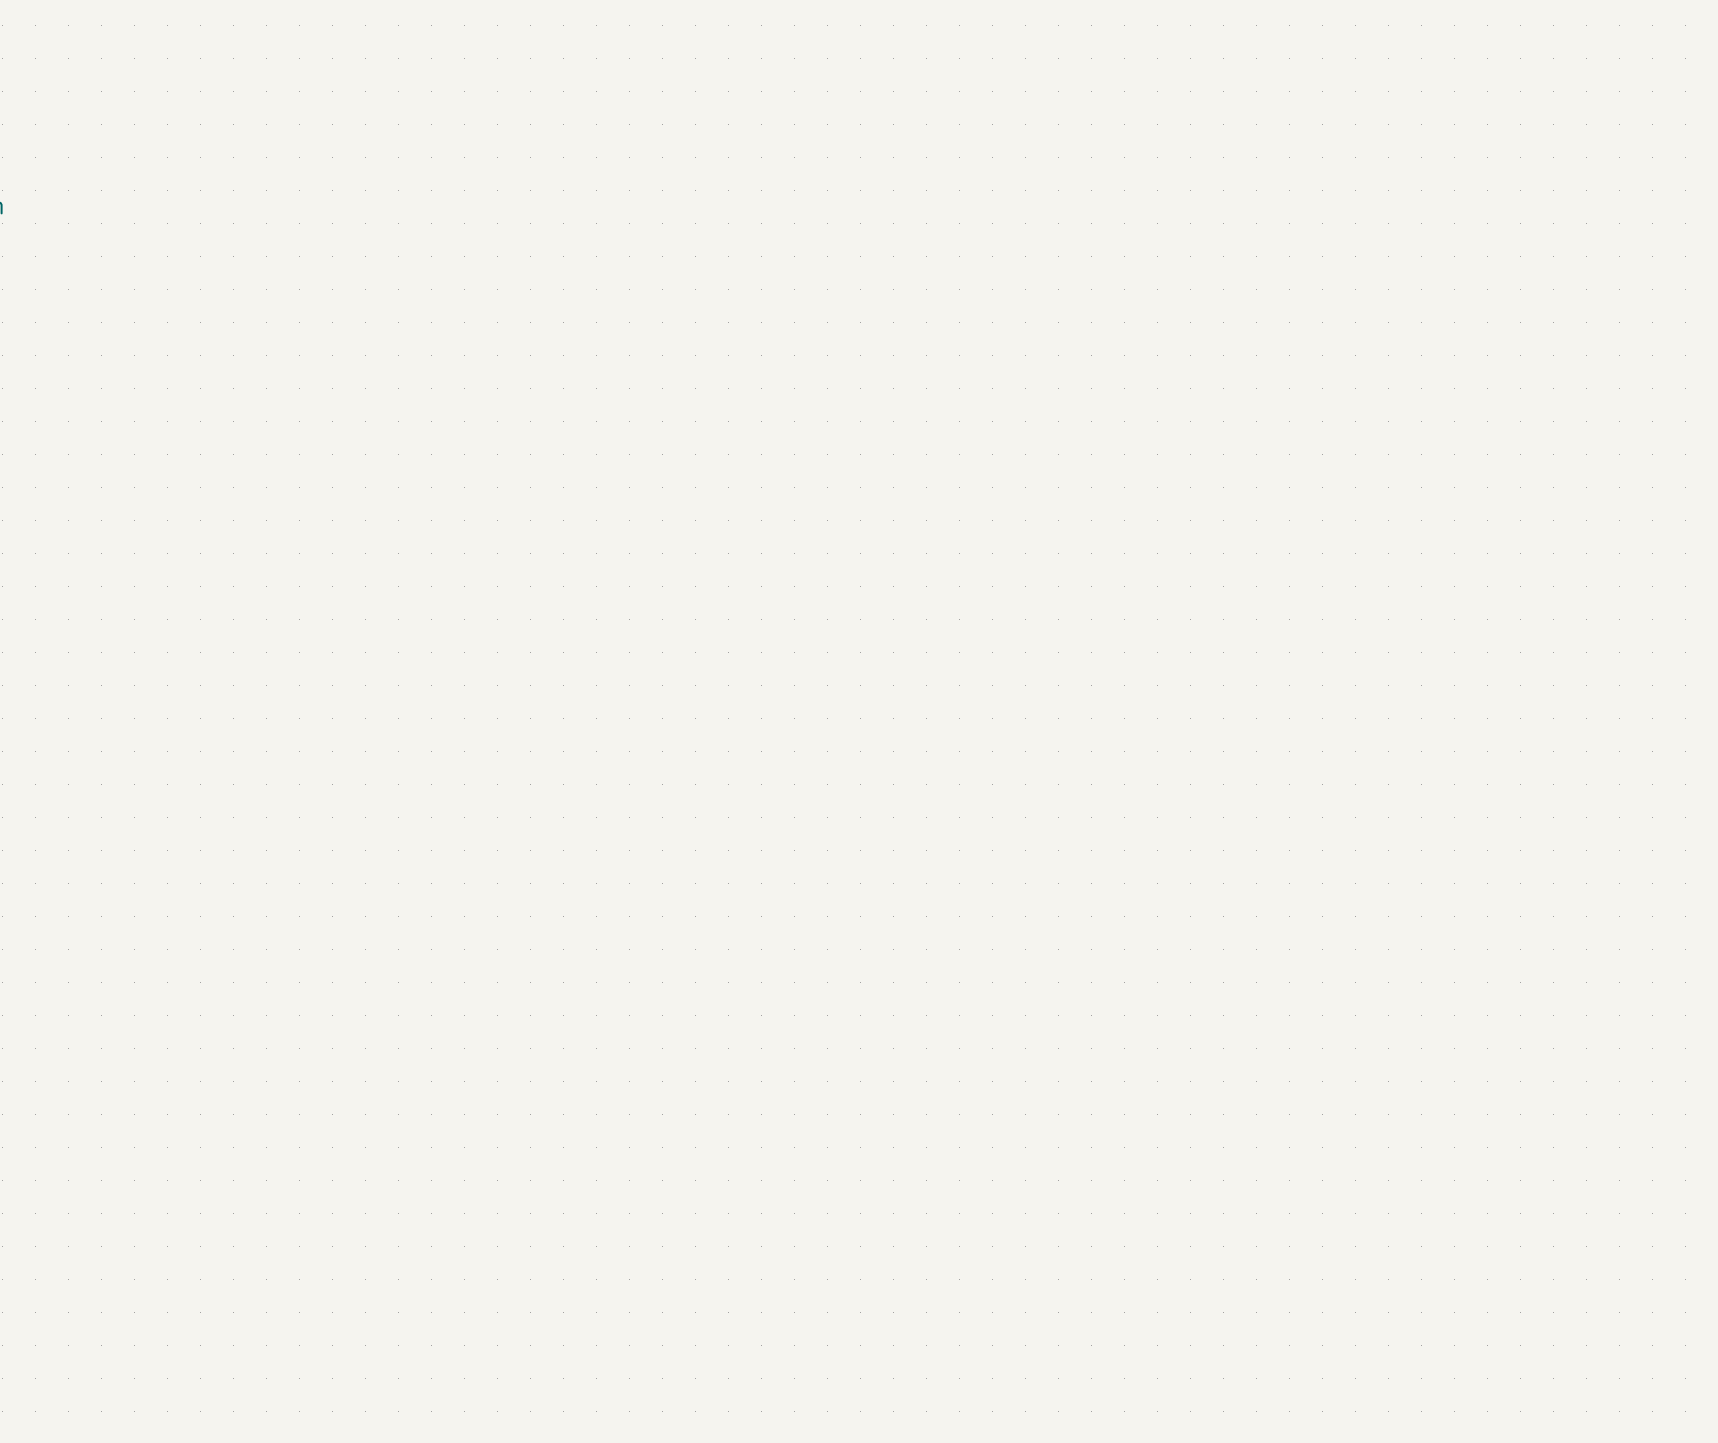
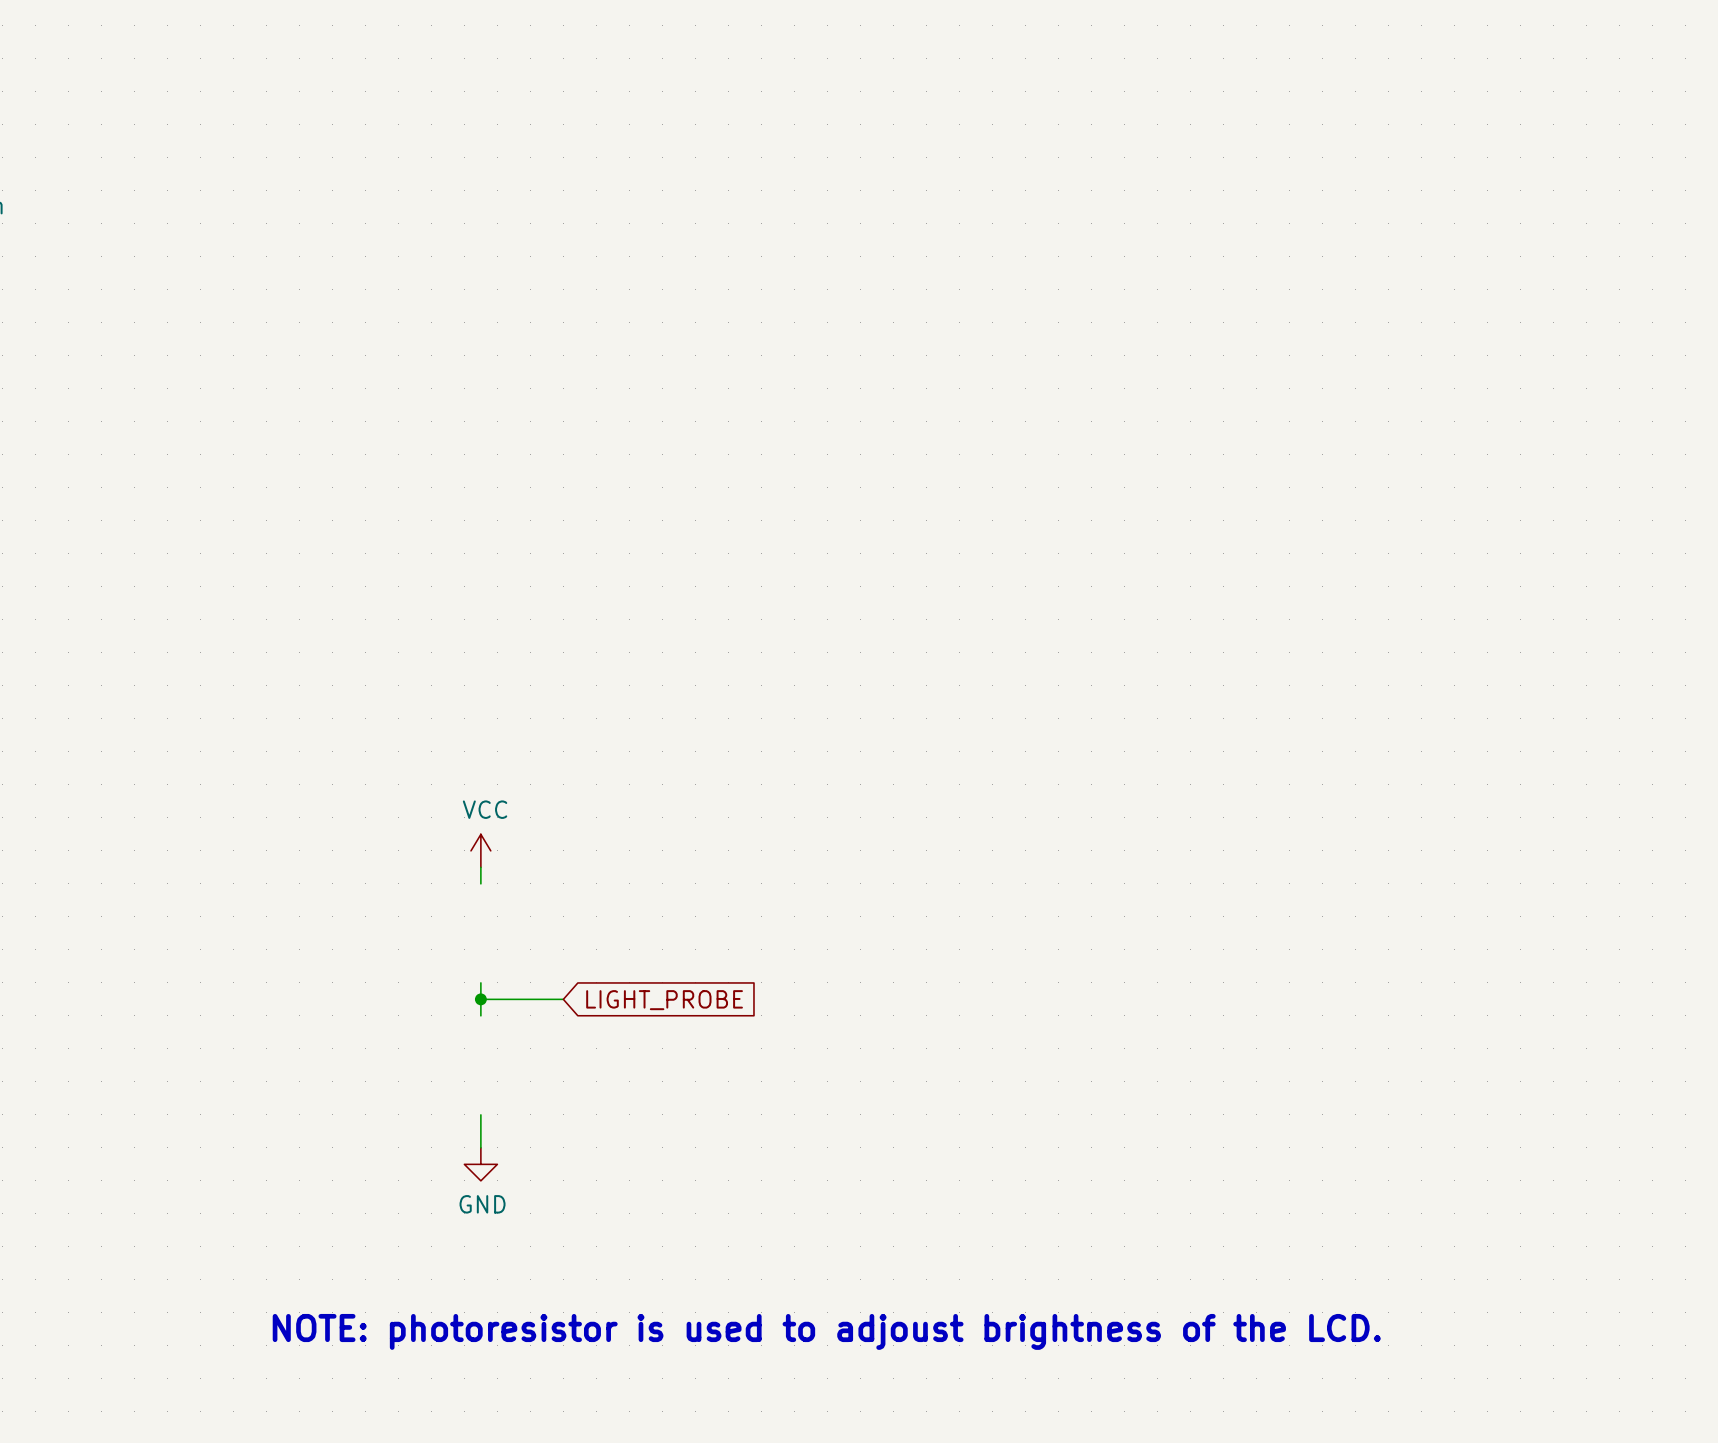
power symbol: none -> VCC (480, 850)
wire: none -> (480, 867) (480, 883)
wire: none -> (480, 982) (480, 1015)
wire: none -> (480, 999) (563, 999)
junction: none -> (480, 999)
global label: none -> LIGHT_PROBE (664, 1000)
wire: none -> (480, 1114) (480, 1147)
power symbol: none -> GND (480, 1164)
text: none -> NOTE: photoresistor is used to adjoust brightness of the LCD. (826, 1331)

